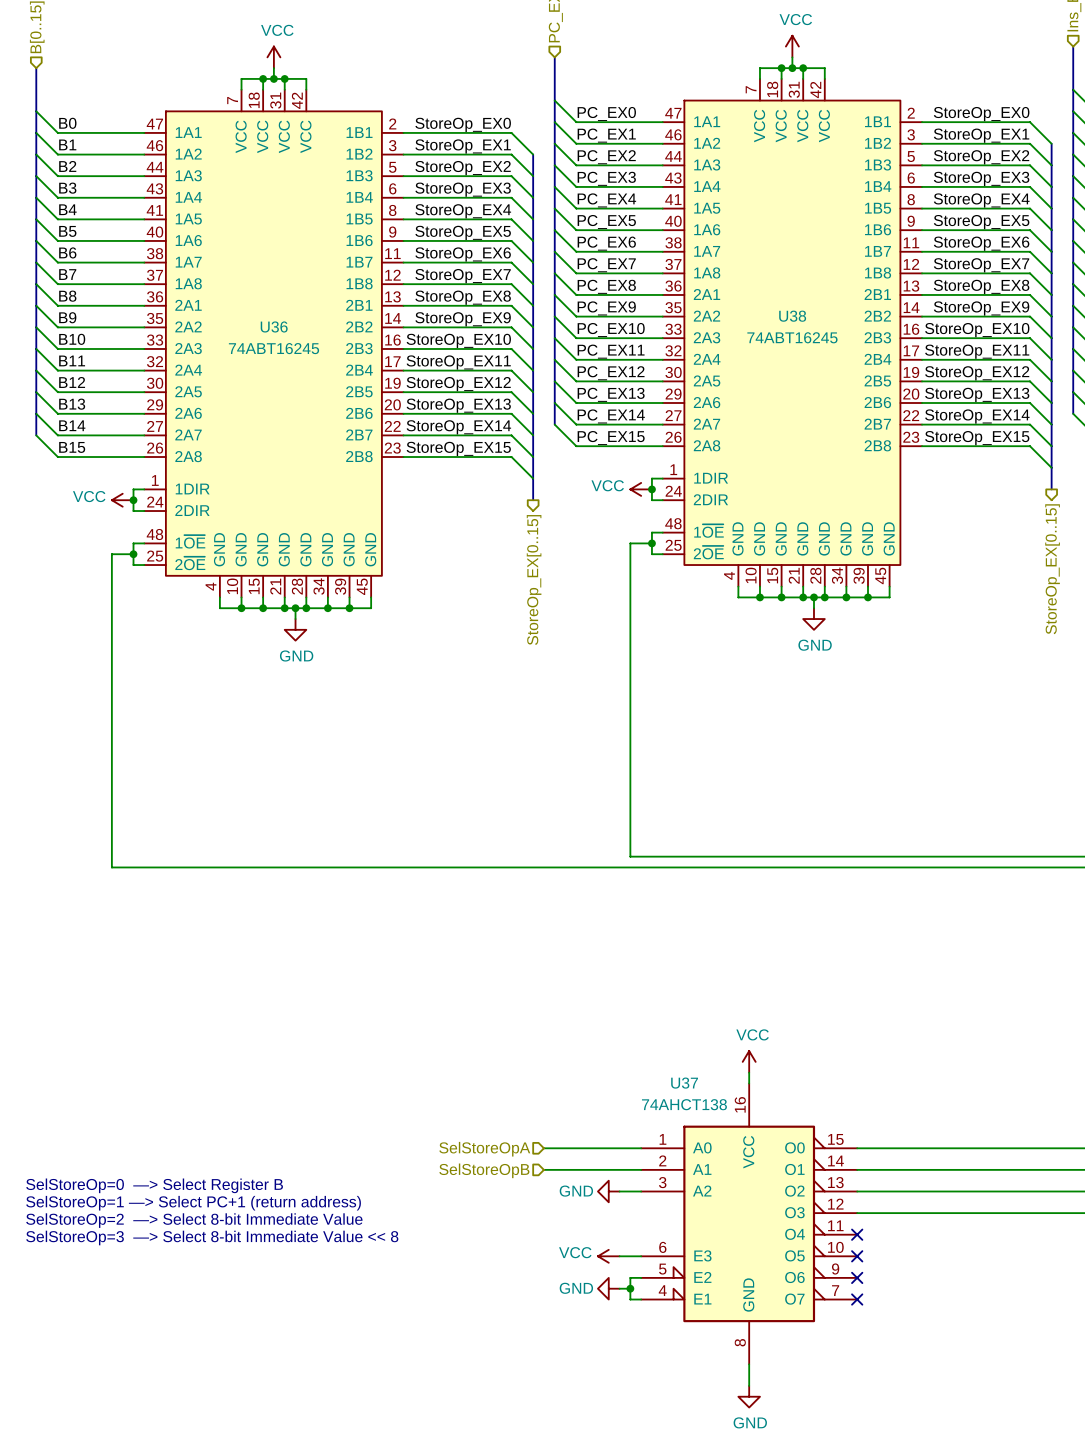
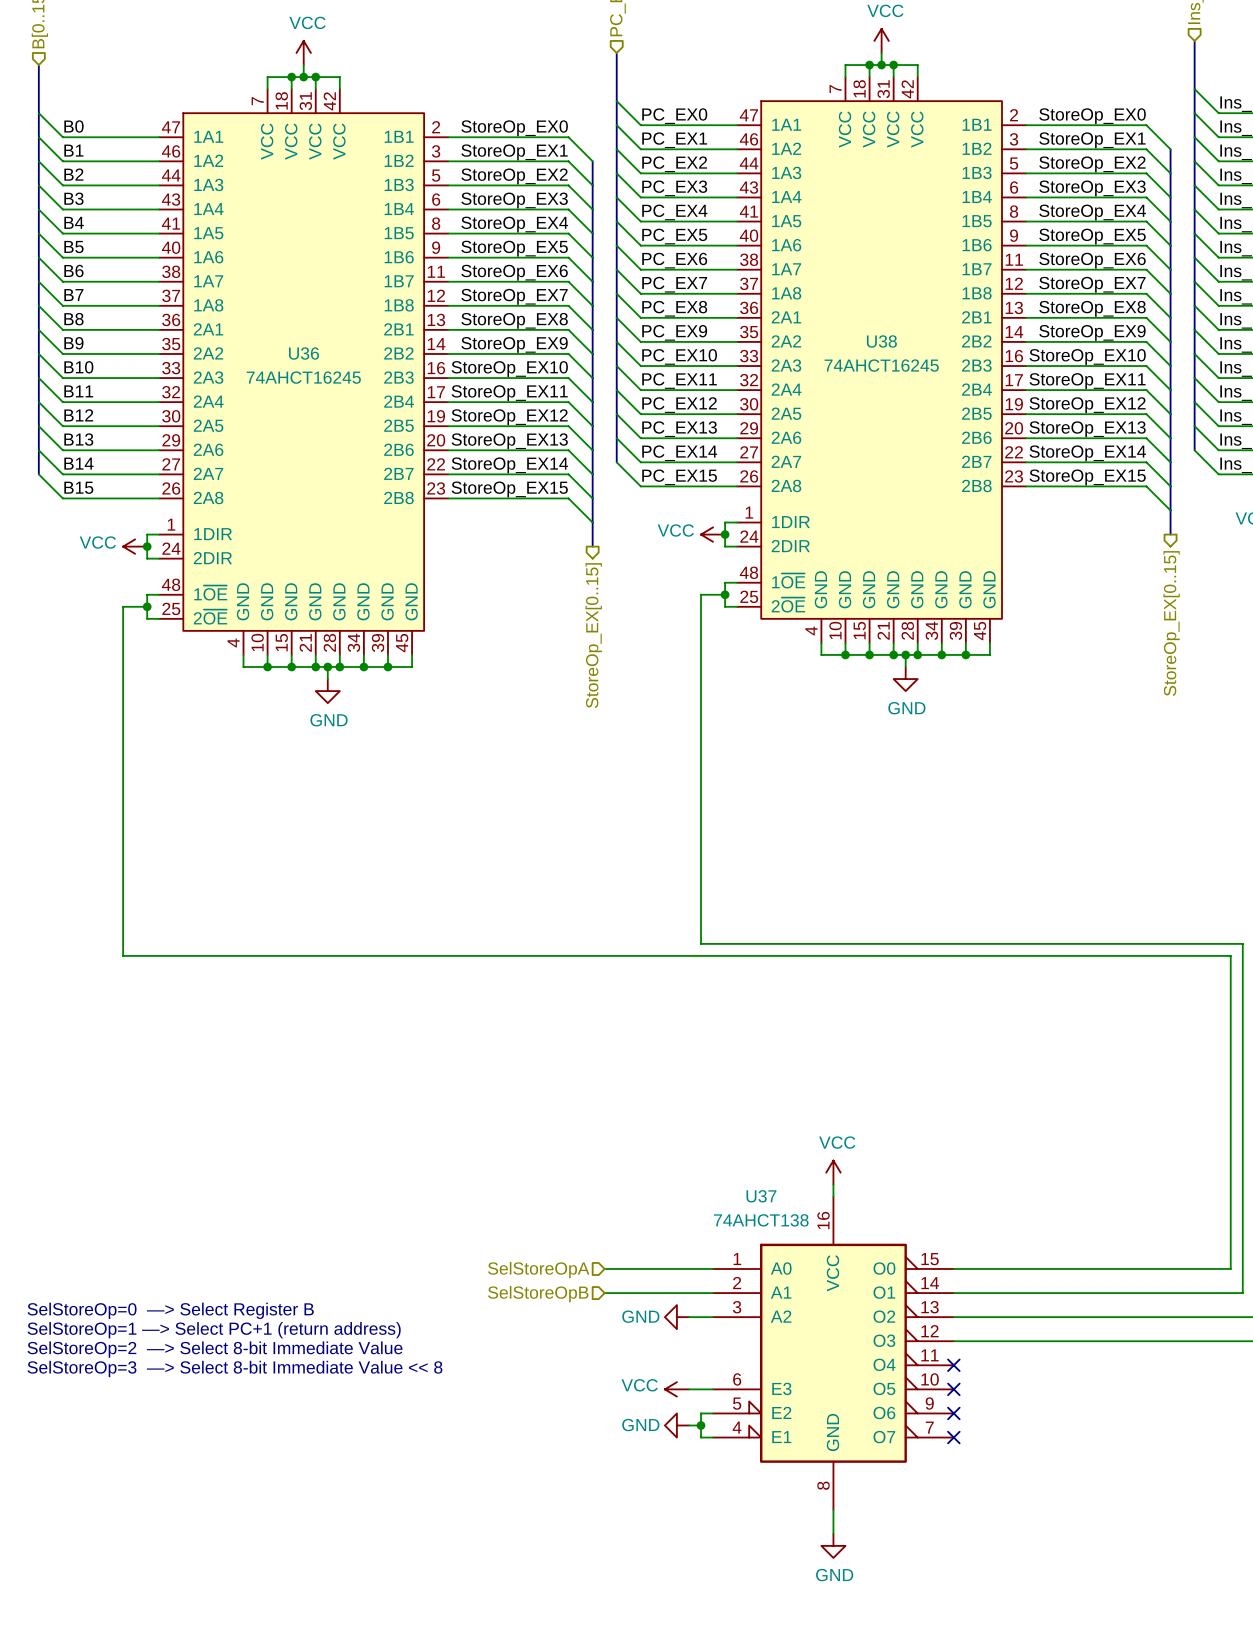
U38 value: 74ABT16245 (792, 337) -> 74AHCT16245 (881, 365)
U36 value: 74ABT16245 (273, 348) -> 74AHCT16245 (303, 377)

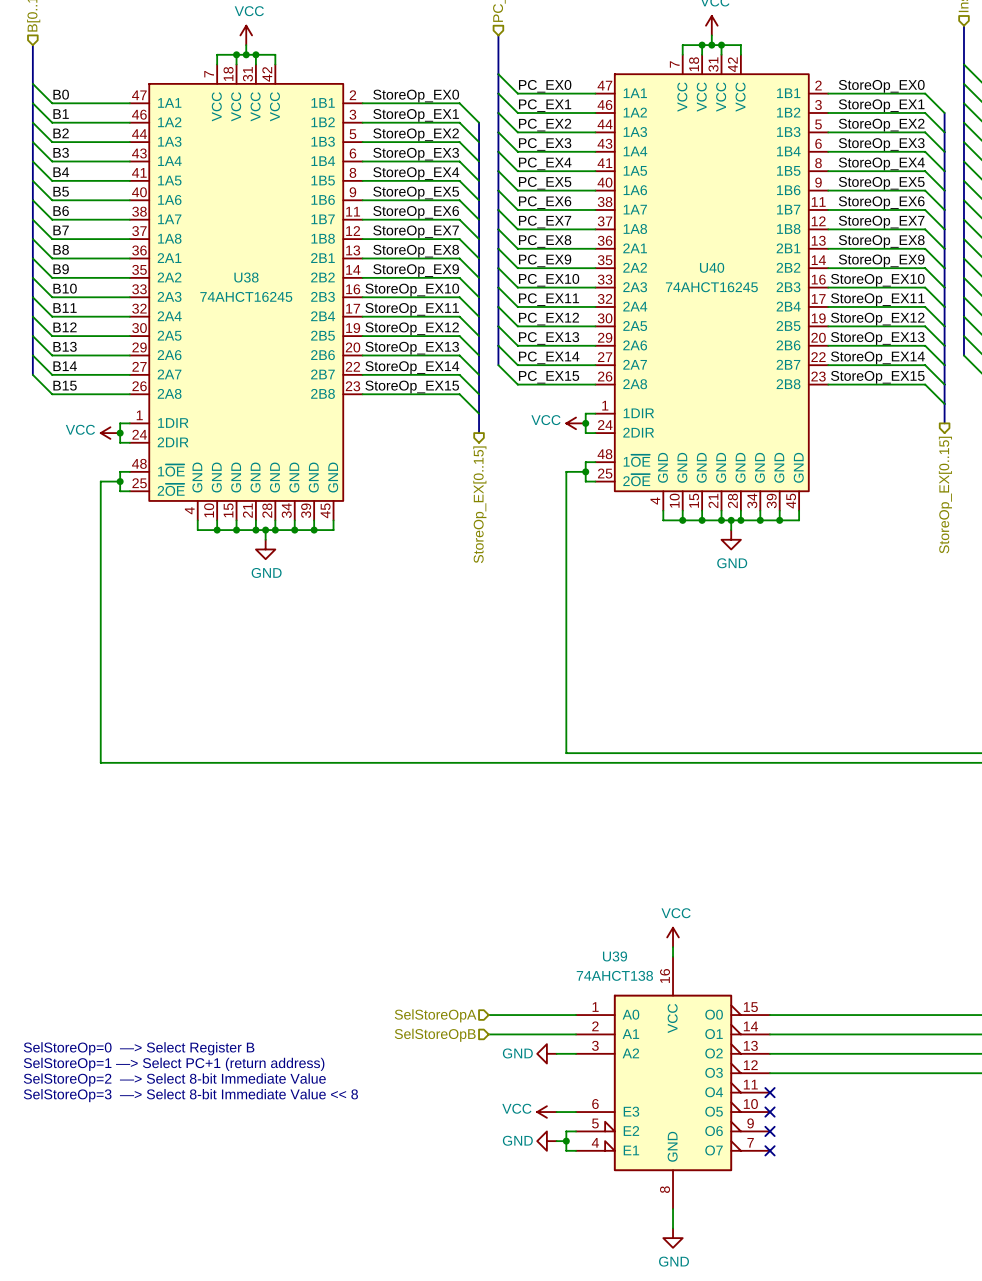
U38 name: U38 (881, 341) -> U40 (712, 267)
U36 name: U36 (303, 353) -> U38 (246, 277)
U37 name: U37 (761, 1196) -> U39 (615, 956)

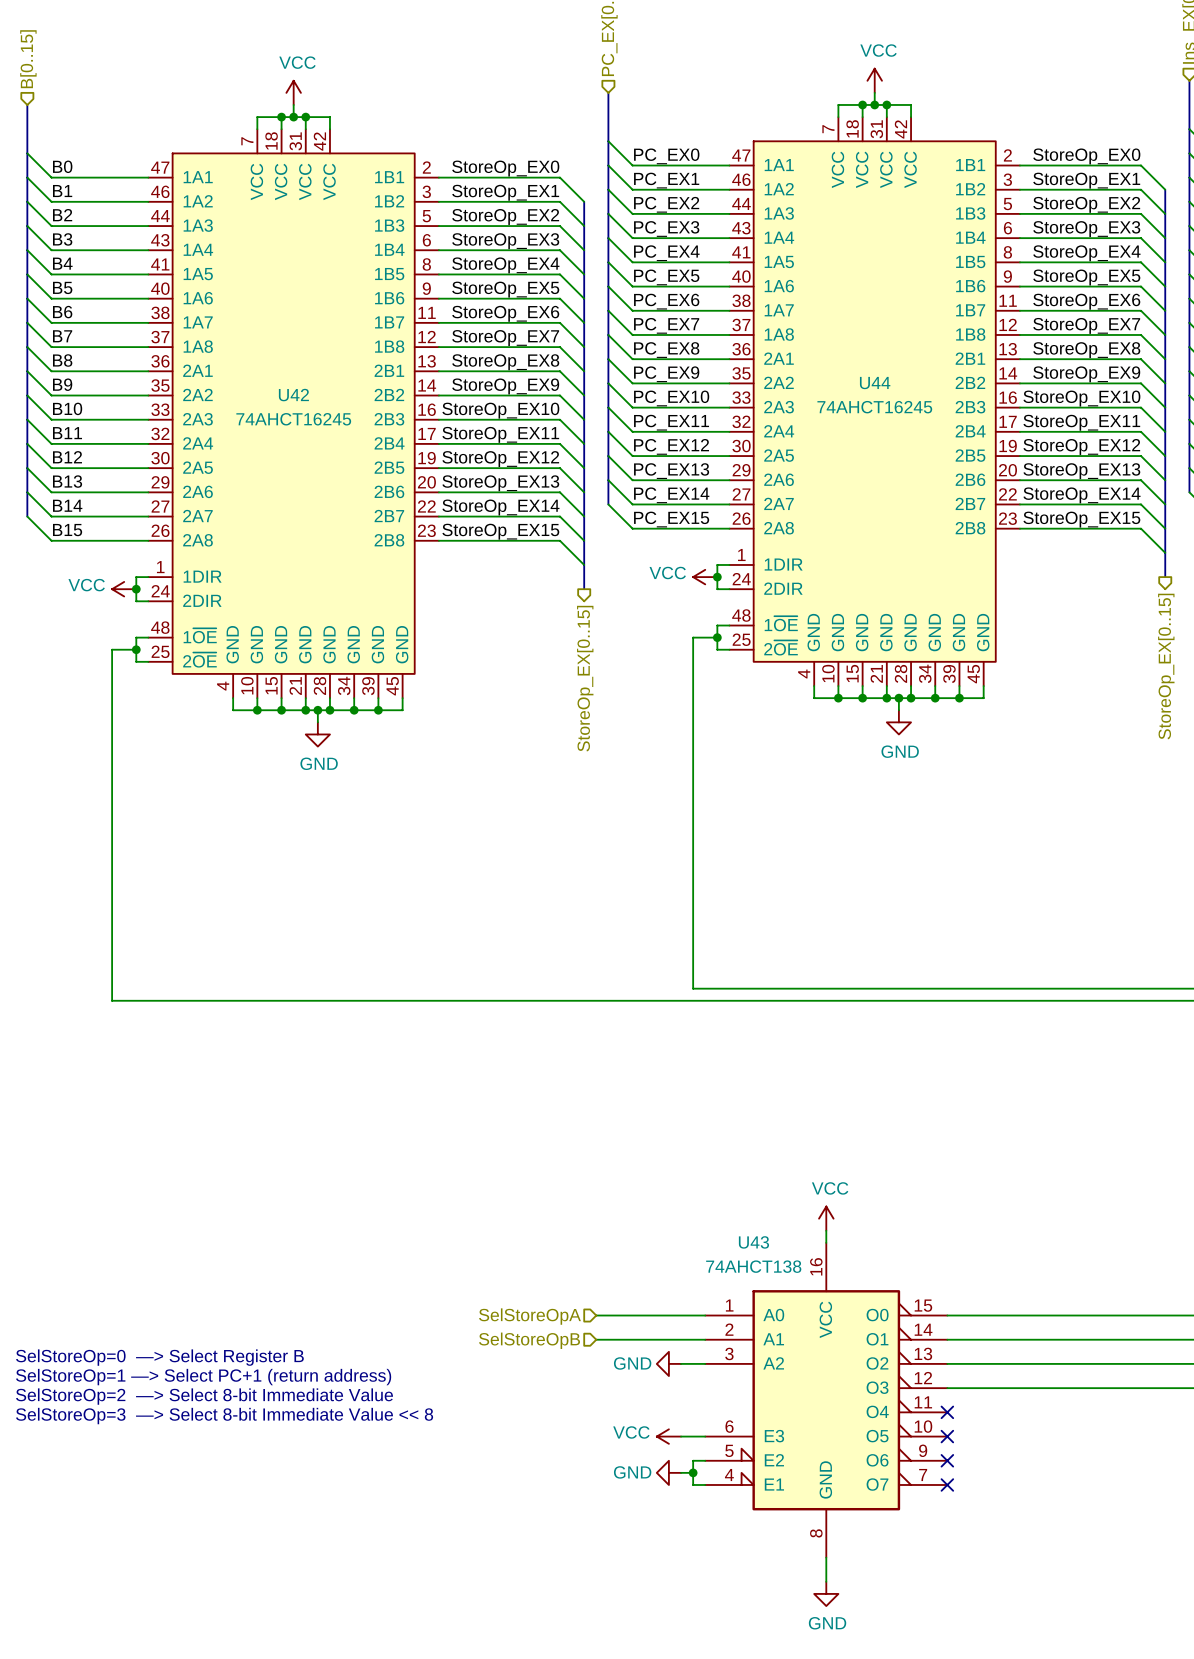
U40 name: U40 (712, 267) -> U44 (875, 383)
U38 name: U38 (246, 277) -> U42 (293, 395)
U39 name: U39 (615, 956) -> U43 (753, 1242)

